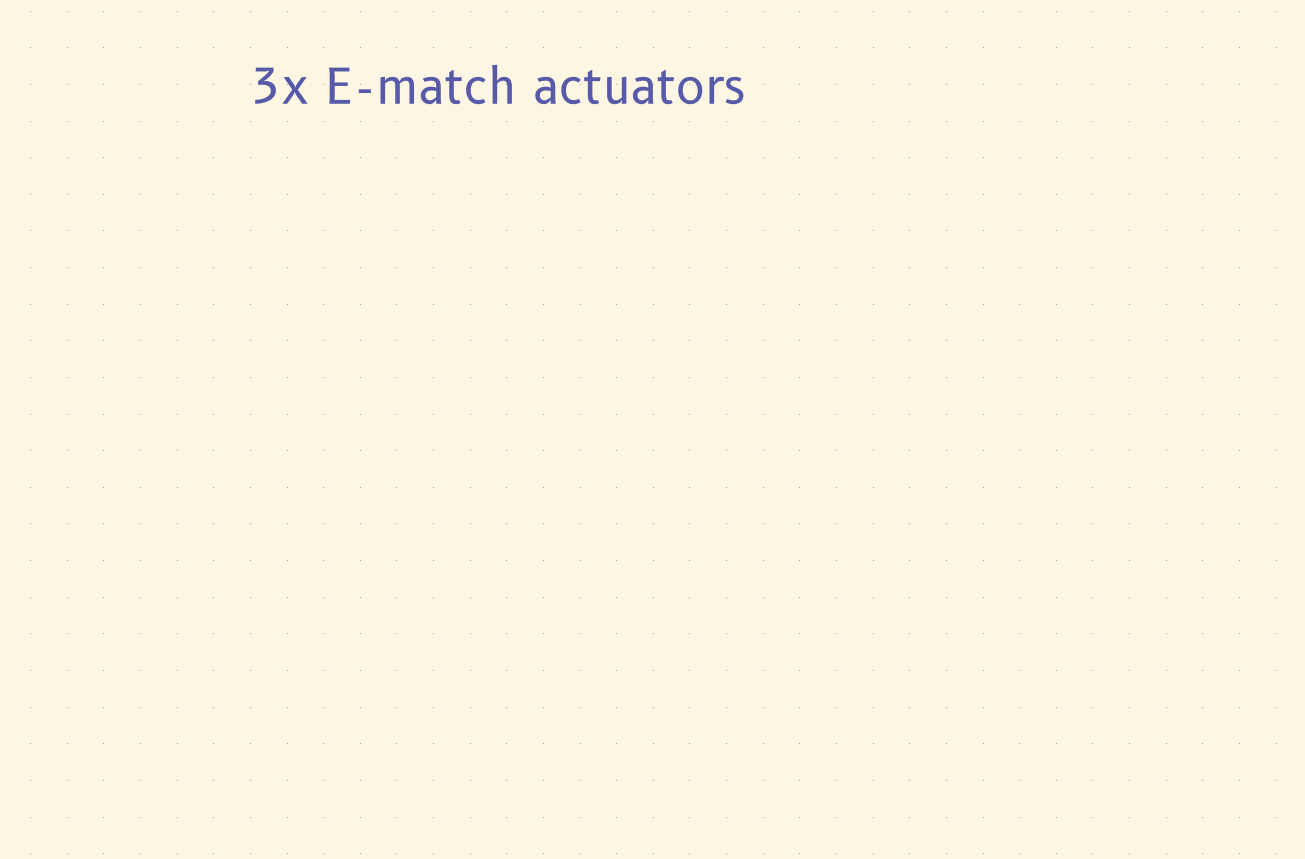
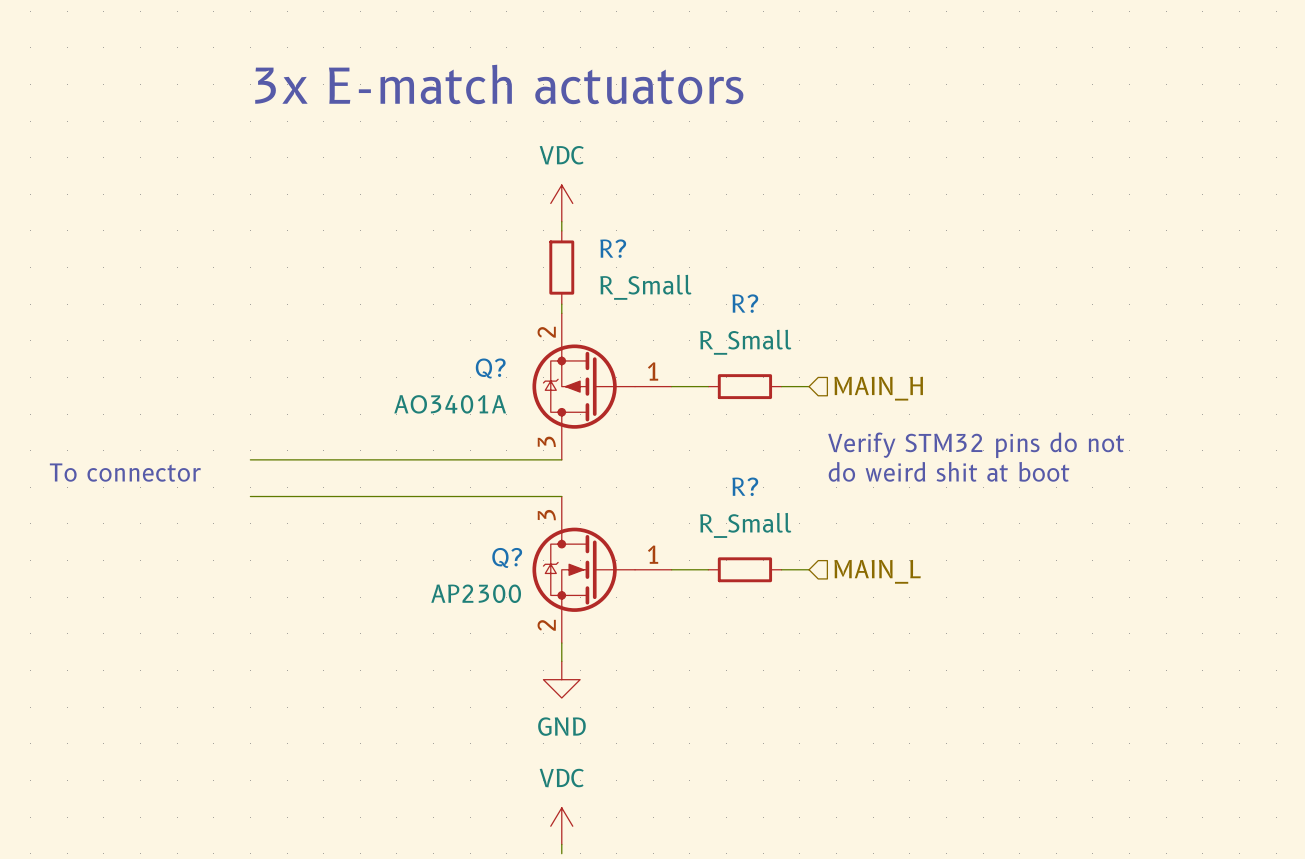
power symbol: none -> VDC (561, 203)
wire: none -> (561, 221) (561, 230)
R?: none -> R_Small (561, 267)
wire: none -> (561, 304) (561, 313)
Q?: none -> AO3401A (602, 386)
wire: none -> (671, 386) (708, 386)
R?: none -> R_Small (744, 386)
wire: none -> (781, 386) (809, 386)
hierarchical label: none -> MAIN_H (878, 388)
text: none -> Verify STM32 pins do not (976, 445)
wire: none -> (250, 459) (561, 459)
text: none -> do weird shit at boot (949, 471)
text: none -> To connector (125, 472)
wire: none -> (250, 496) (561, 496)
Q?: none -> AP2300 (602, 569)
wire: none -> (671, 569) (708, 569)
R?: none -> R_Small (744, 569)
wire: none -> (781, 569) (809, 569)
hierarchical label: none -> MAIN_L (877, 571)
wire: none -> (561, 643) (561, 661)
power symbol: none -> GND (561, 679)
power symbol: none -> VDC (561, 826)
wire: none -> (561, 844) (561, 853)

